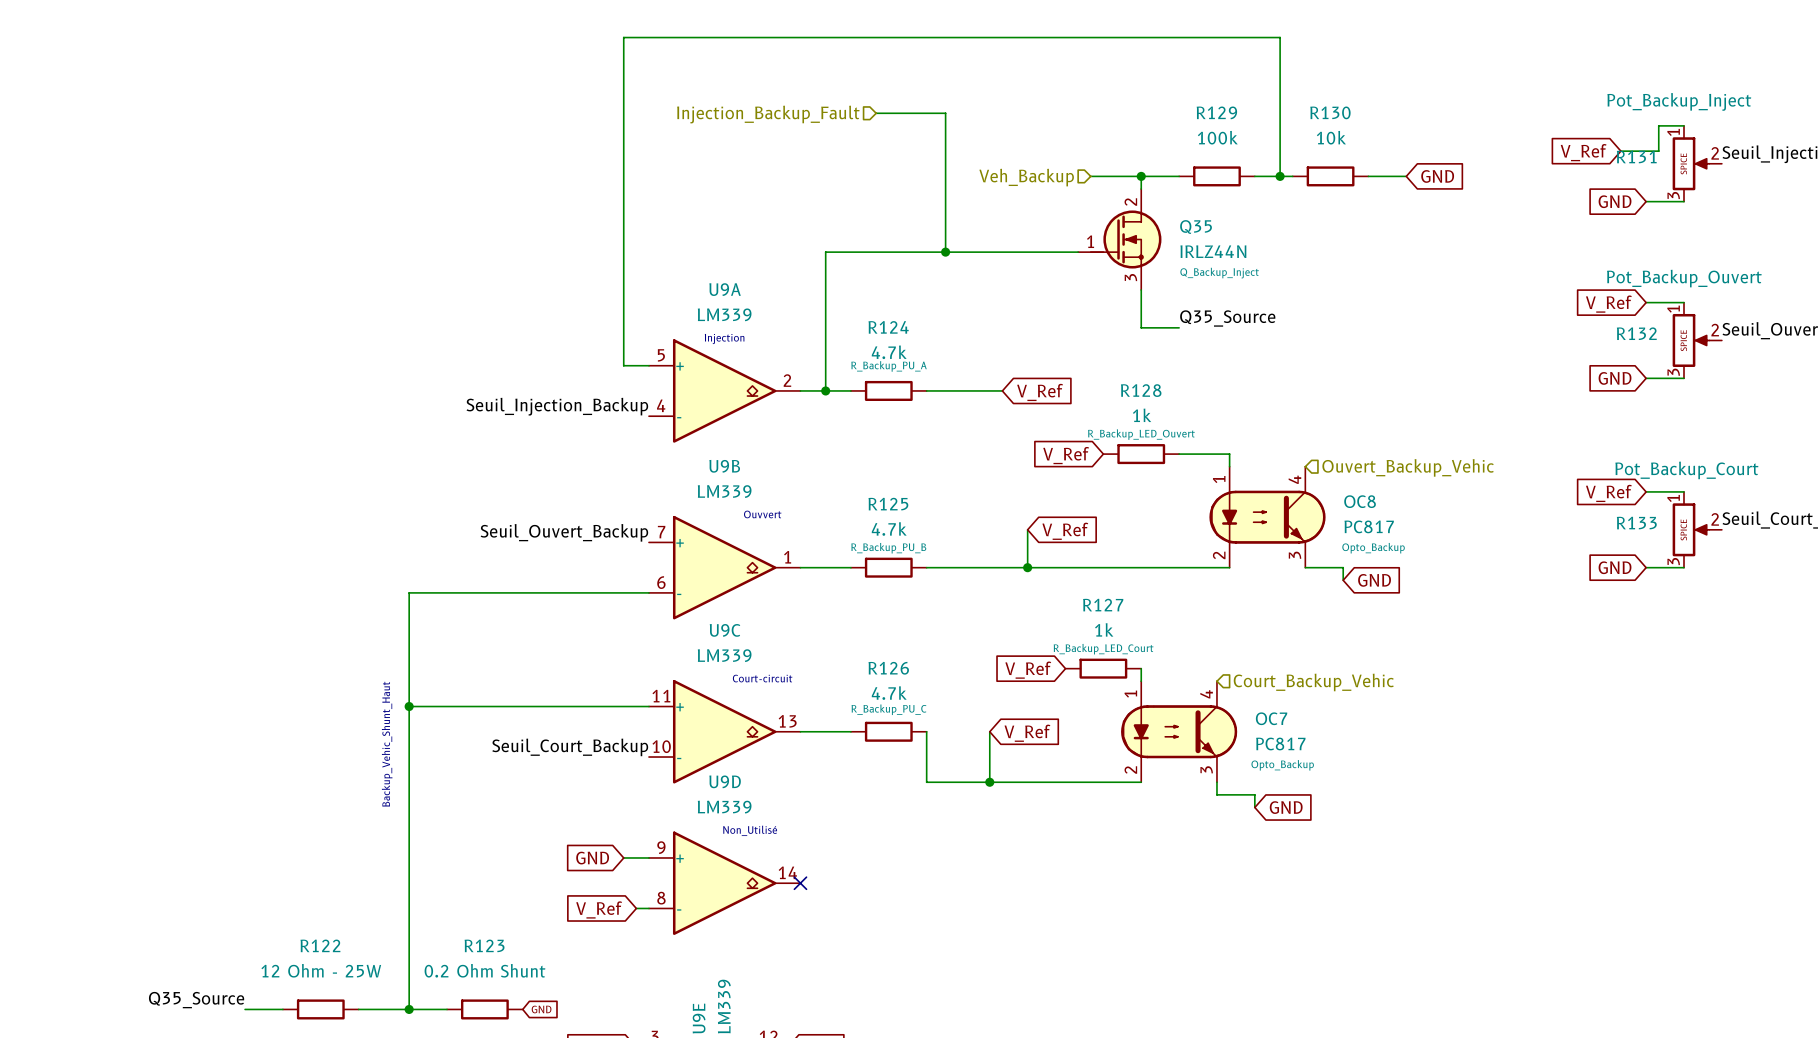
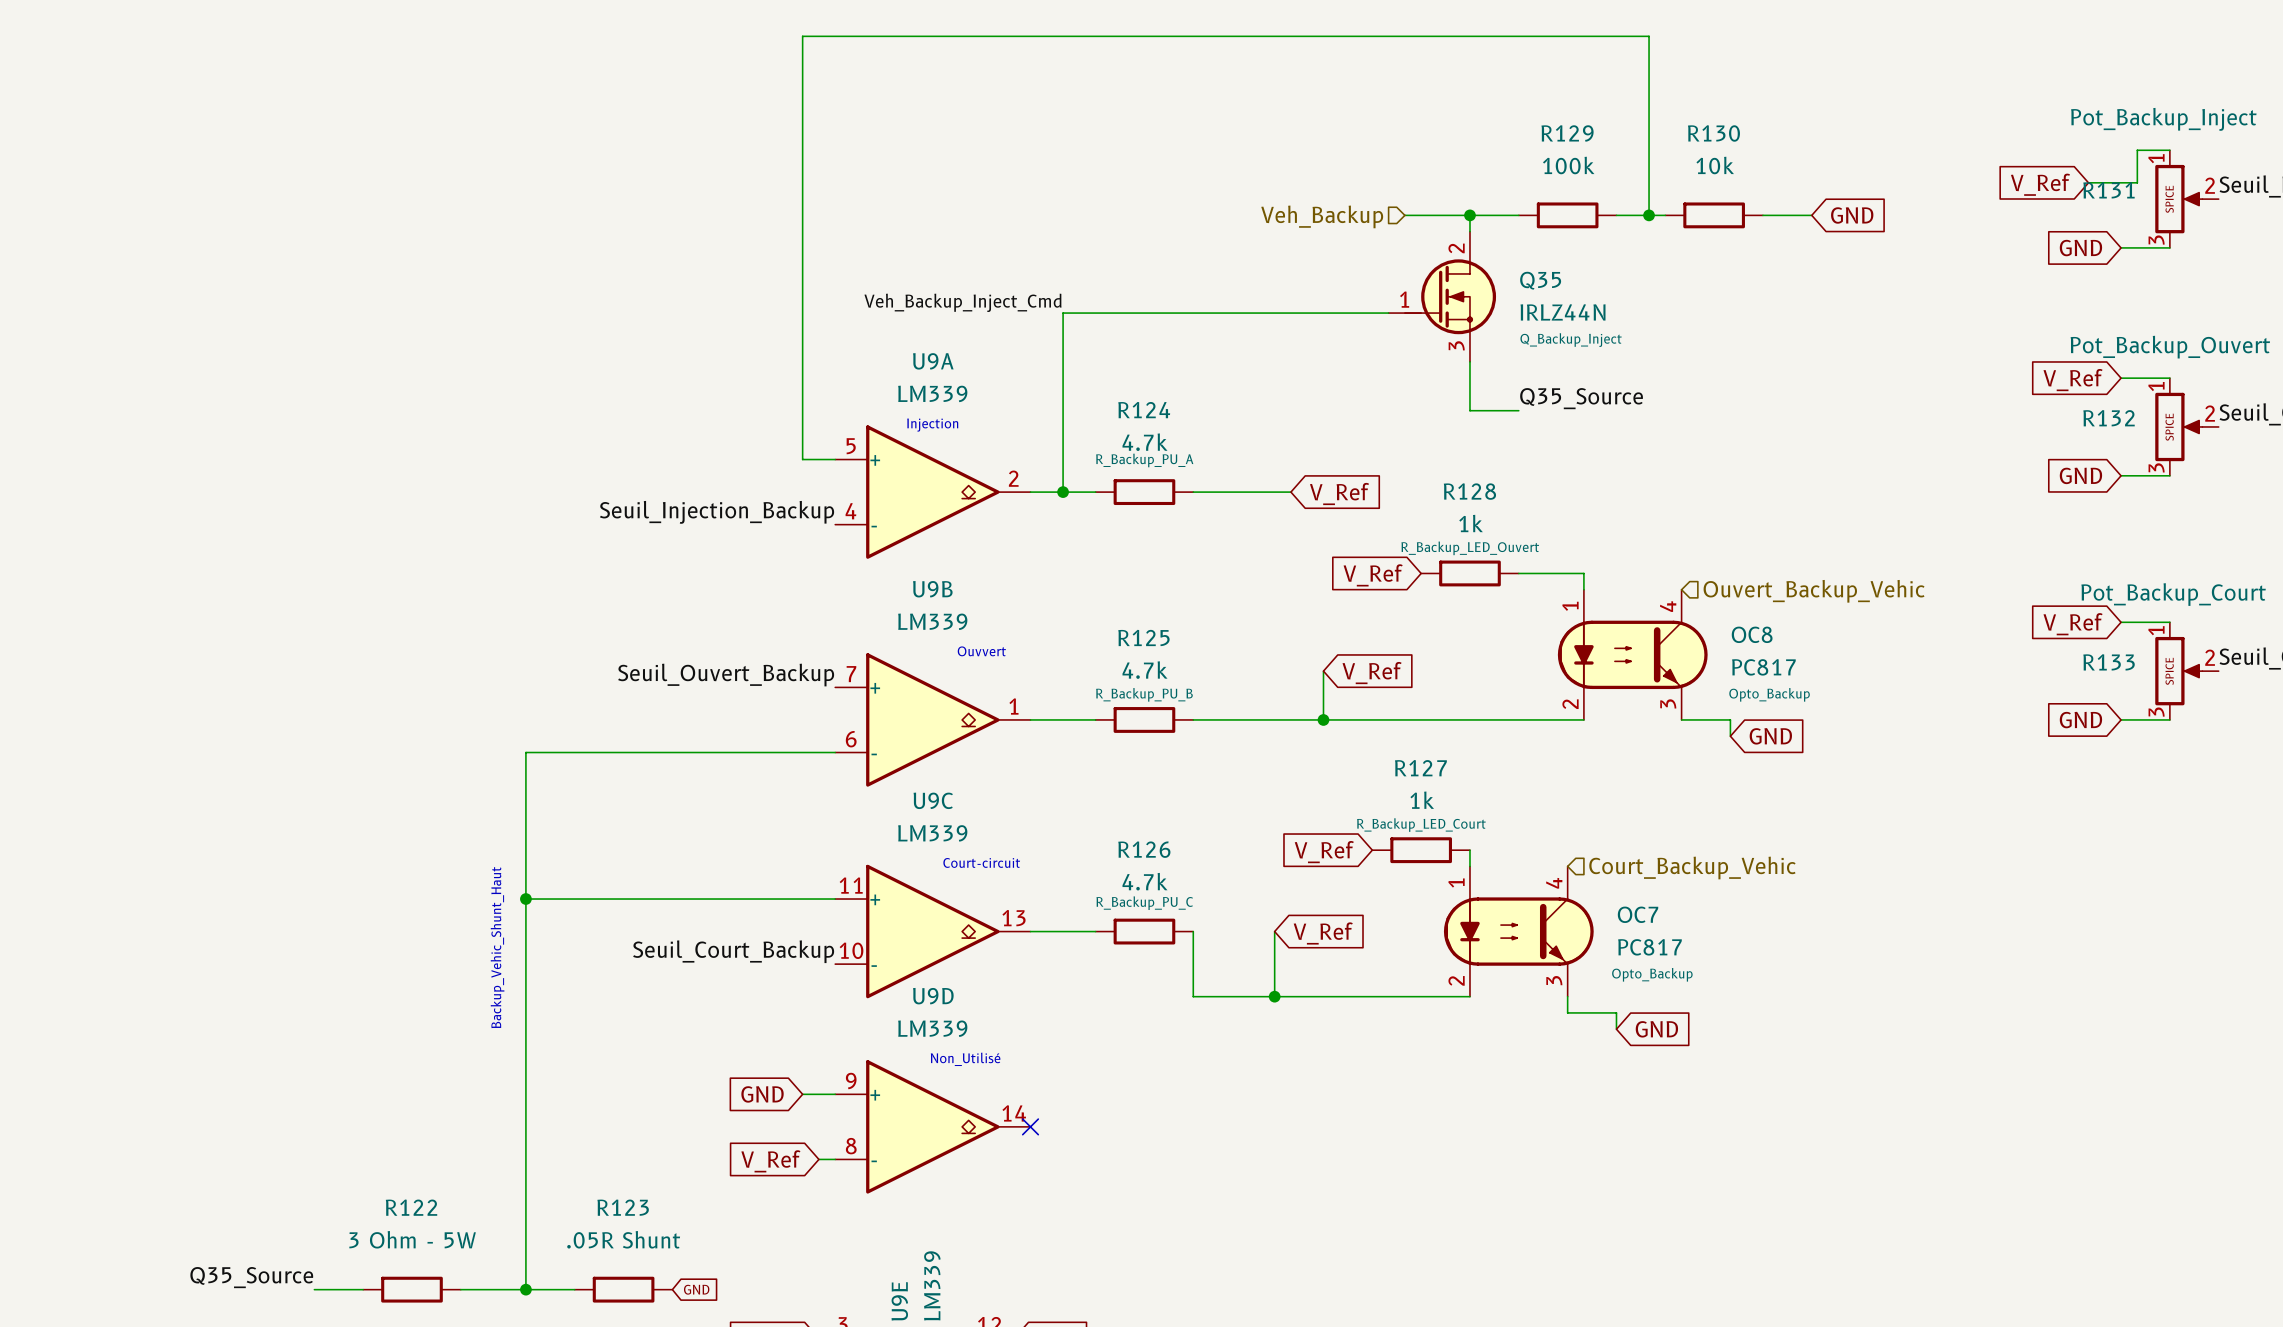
wire: (876, 113) (945, 113) (945, 252) -> none
hierarchical label: Injection_Backup_Fault (768, 114) -> none
label: none -> Veh_Backup_Inject_Cmd (962, 302)
junction: (945, 252) -> none
R122 value: 12 Ohm - 25W (321, 970) -> 3 Ohm - 5W (412, 1239)
R123 value: 0.2 Ohm Shunt (484, 970) -> .05R Shunt (623, 1239)

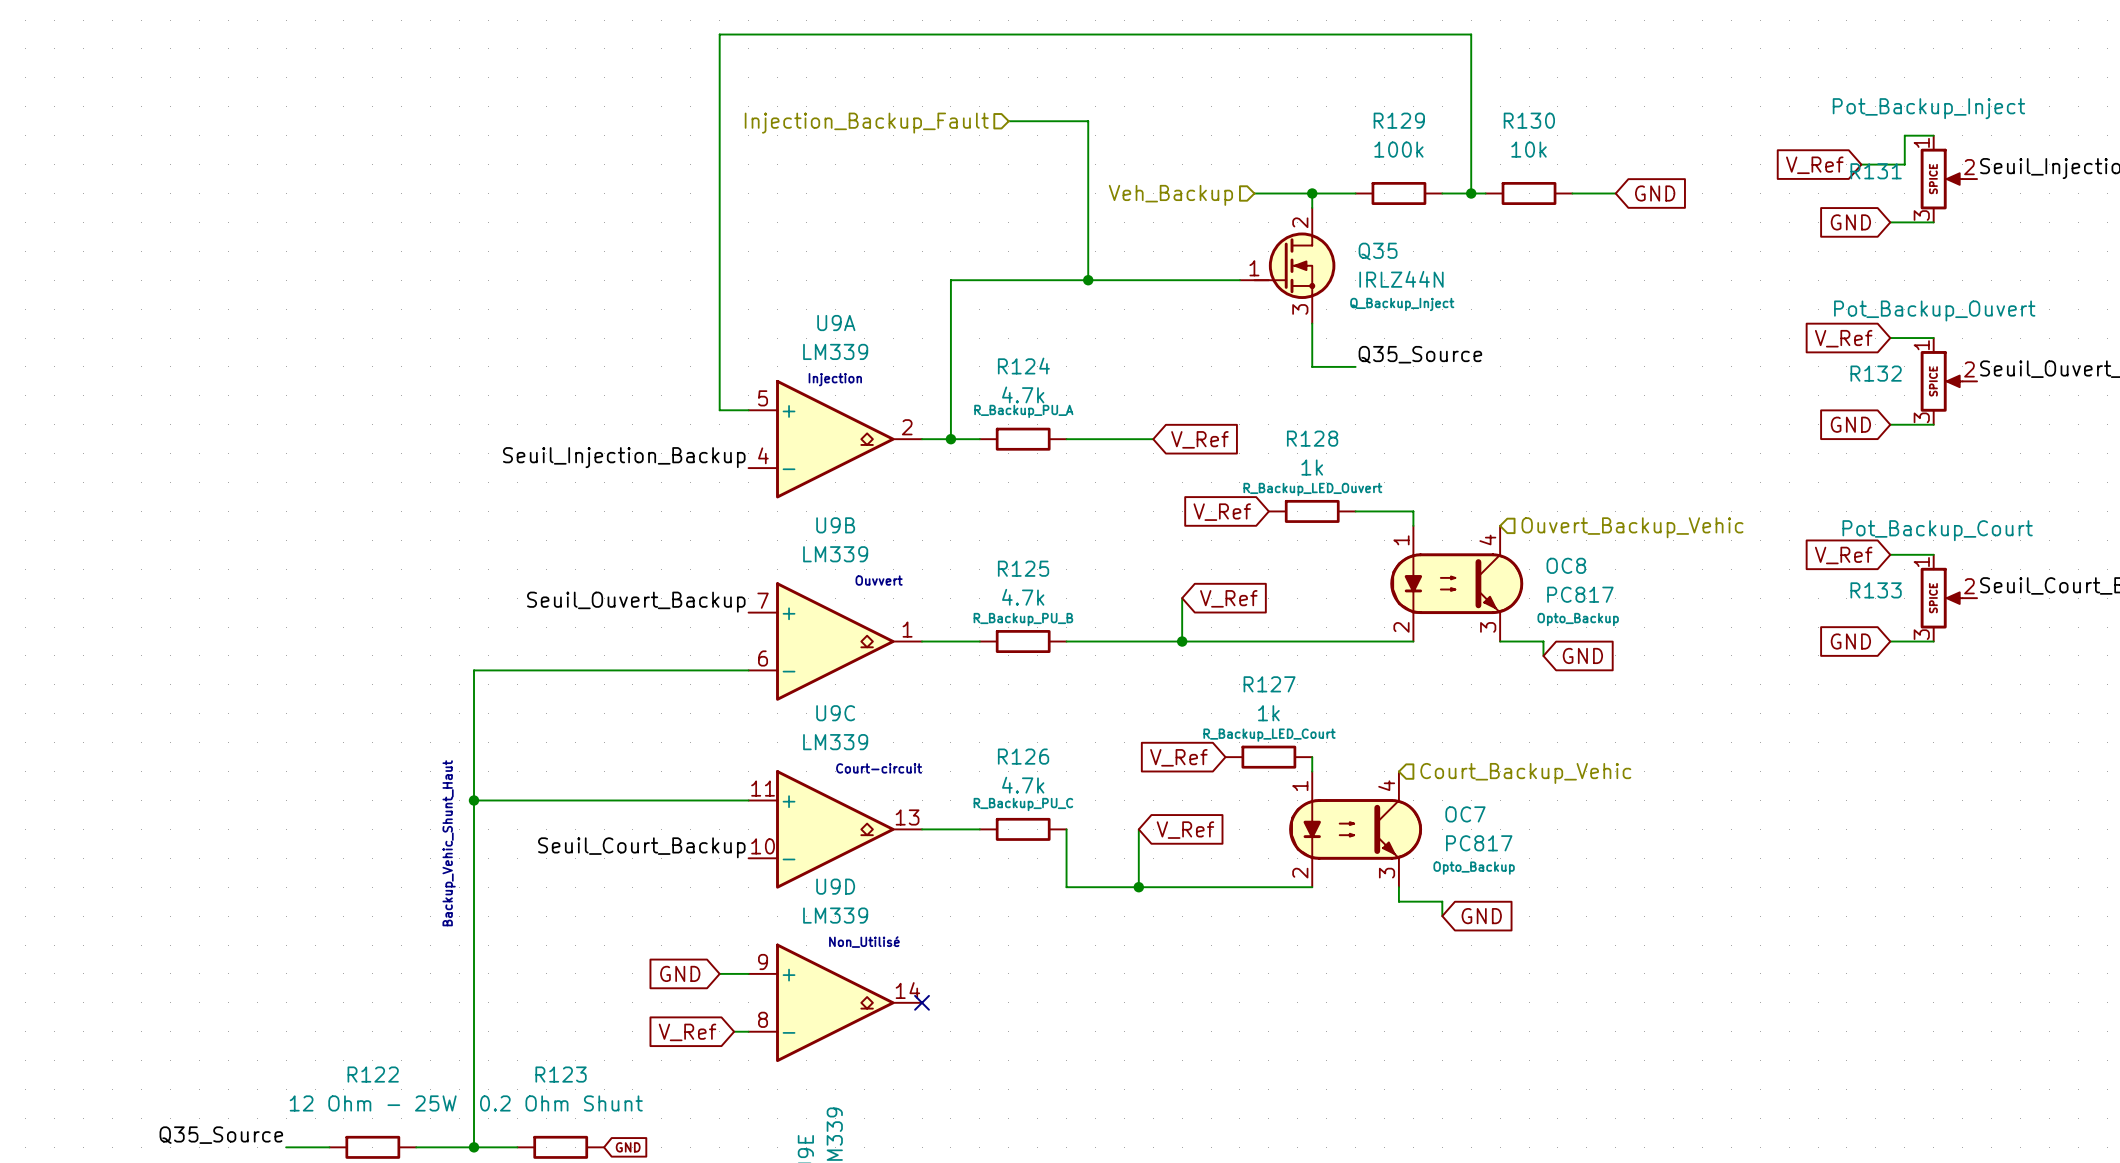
wire: none -> (1008, 121) (1088, 121) (1088, 280)
hierarchical label: none -> Injection_Backup_Fault (866, 123)
label: Veh_Backup_Inject_Cmd (962, 302) -> none
junction: none -> (1088, 280)
R122 value: 3 Ohm - 5W (412, 1239) -> 12 Ohm - 25W (373, 1103)
R123 value: .05R Shunt (623, 1239) -> 0.2 Ohm Shunt (561, 1103)

